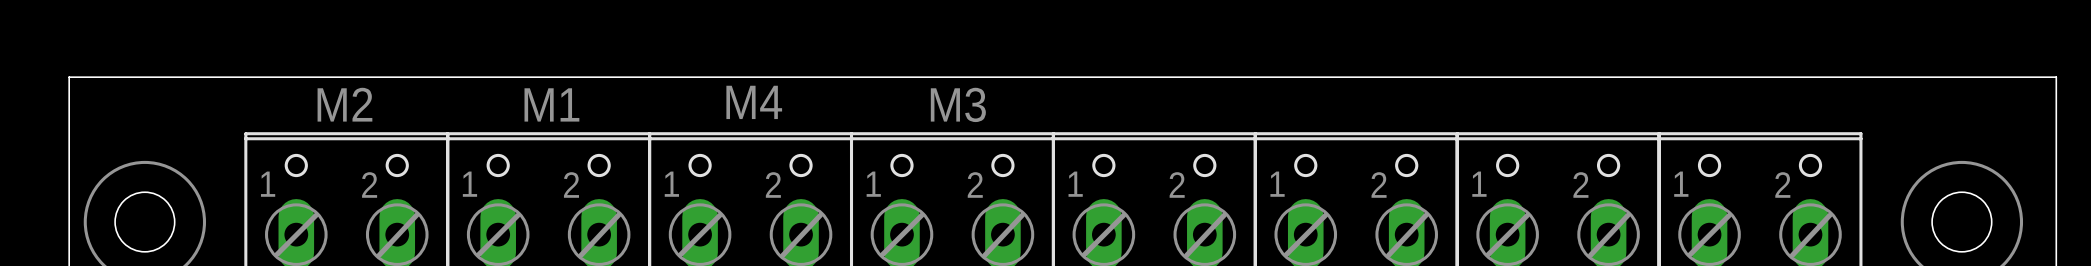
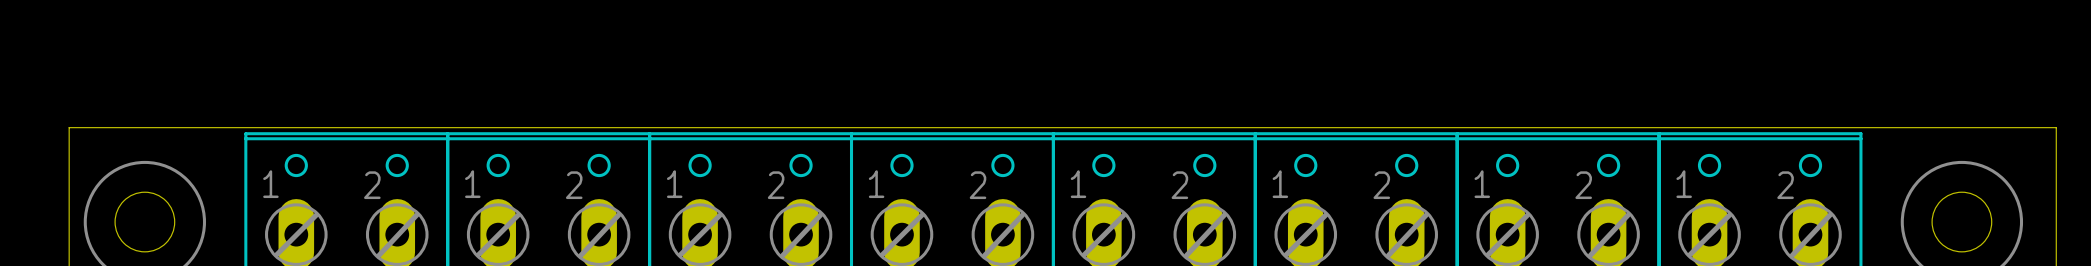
text: M4 (754, 102) -> none
text: M2 (344, 104) -> none
text: M1 (551, 104) -> none
text: M3 (958, 104) -> none
board edge: (69, 127) (69, 77) (2056, 77) (2056, 127) -> (69, 127) (2056, 127)

